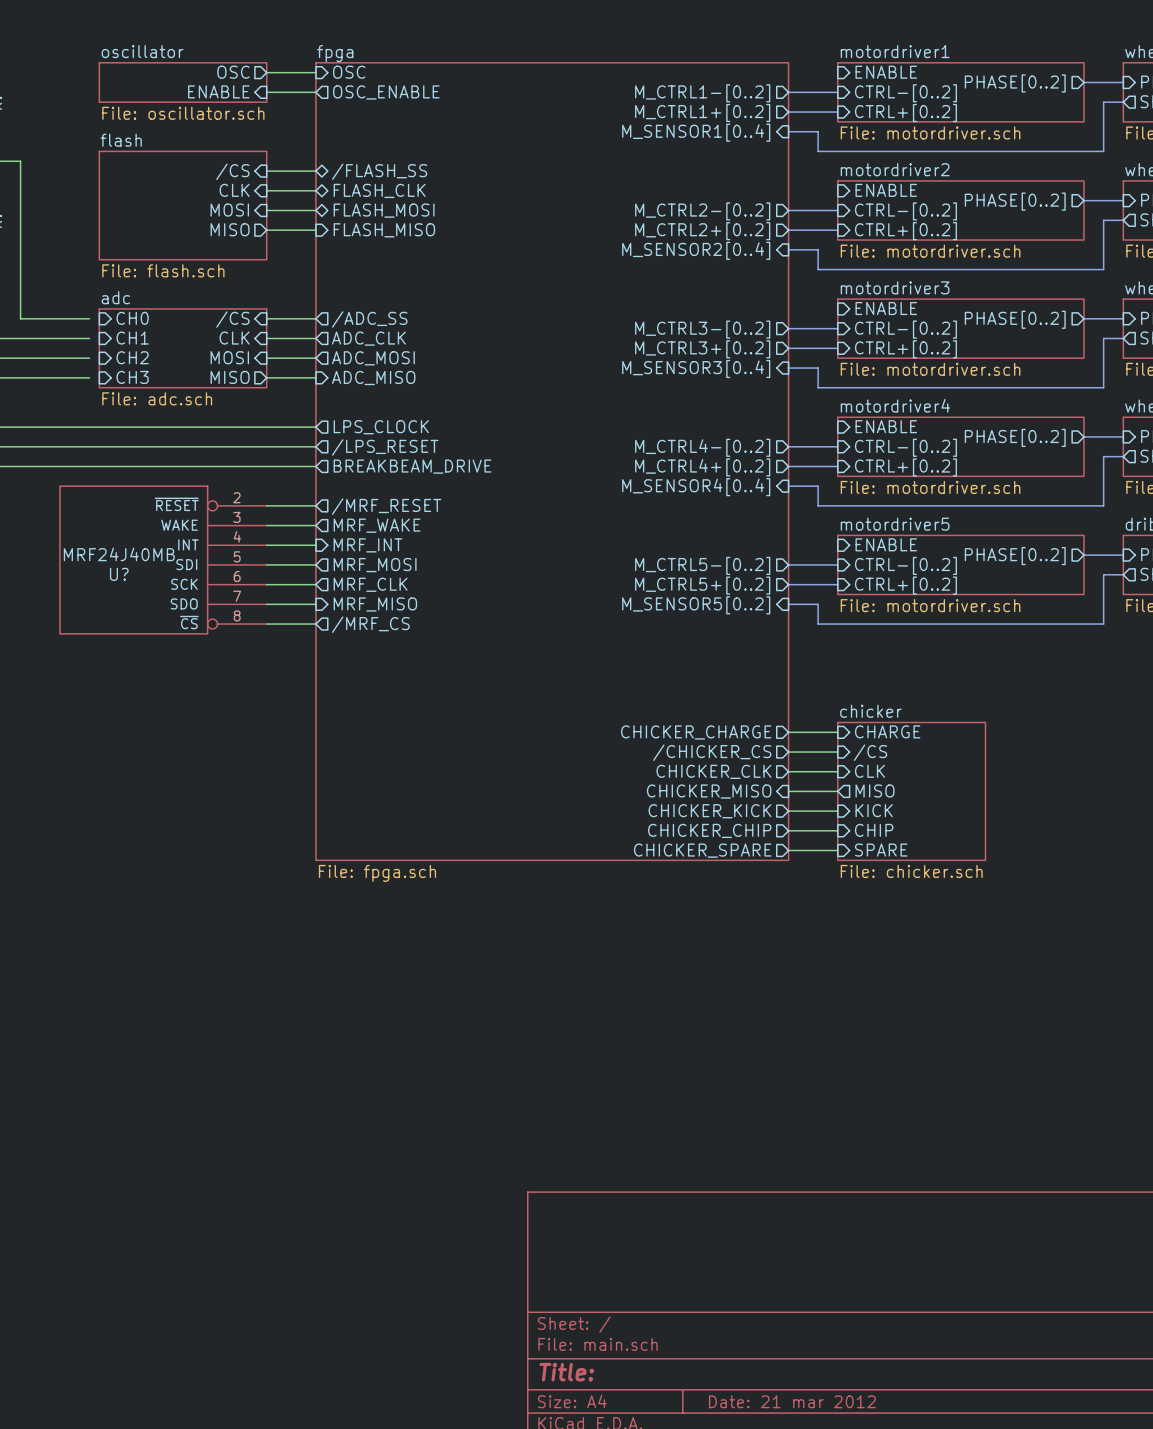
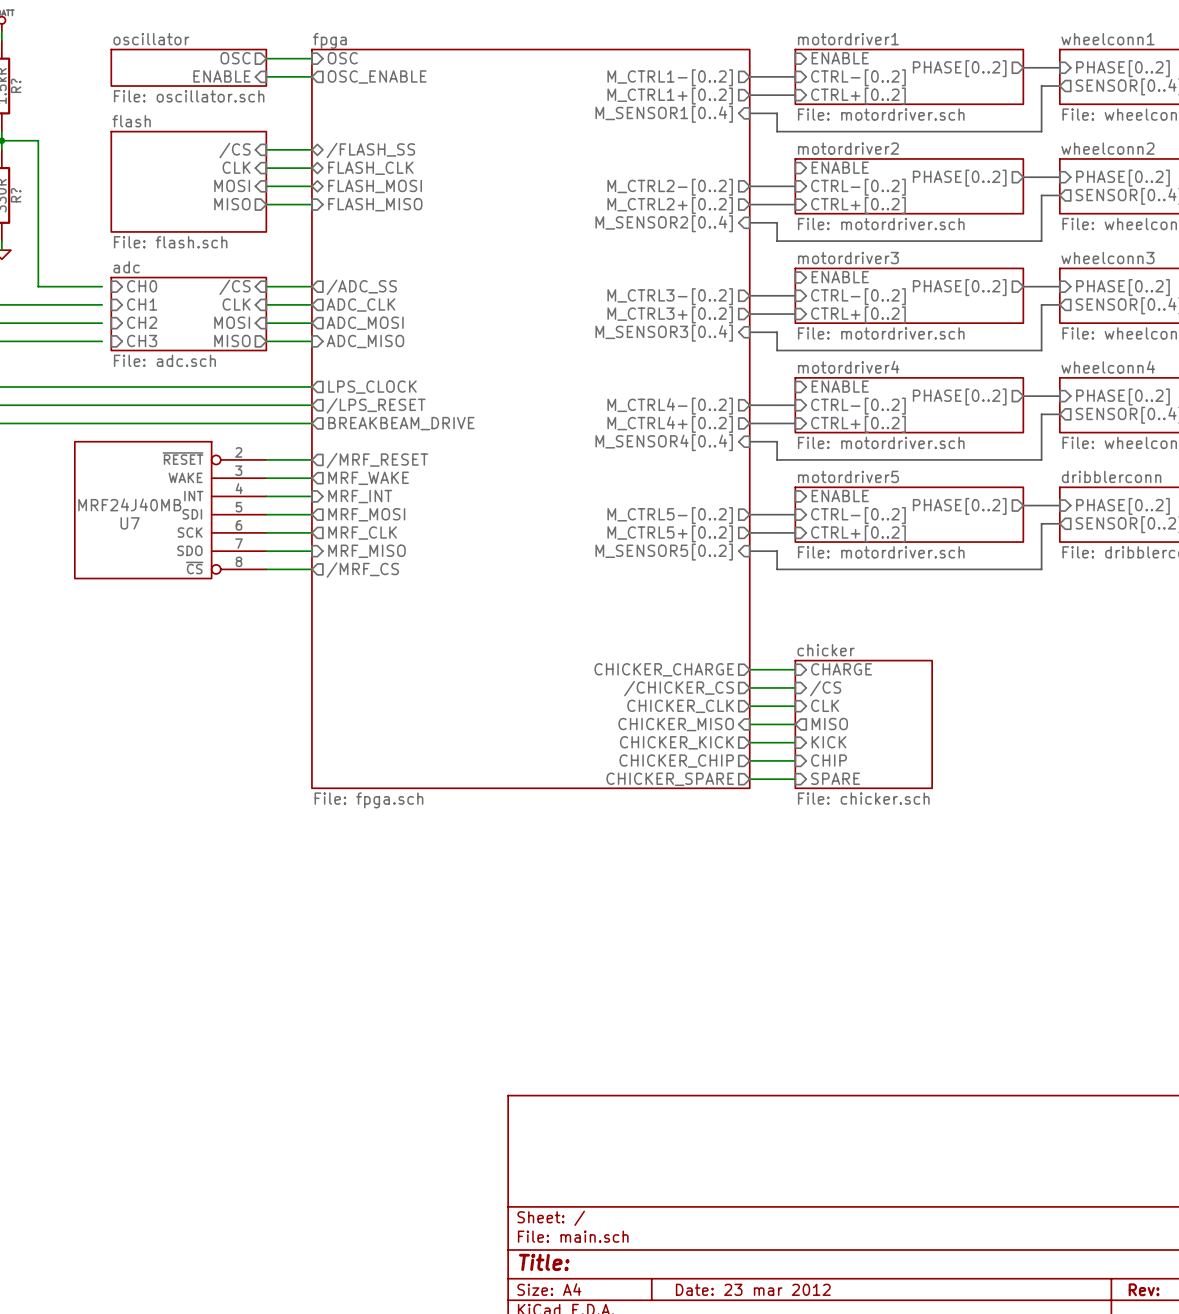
U? name: U? (119, 574) -> U7 (130, 523)
title block: Date: 21 mar 2012 (792, 1401) -> Date: 23 mar 2012 (753, 1289)

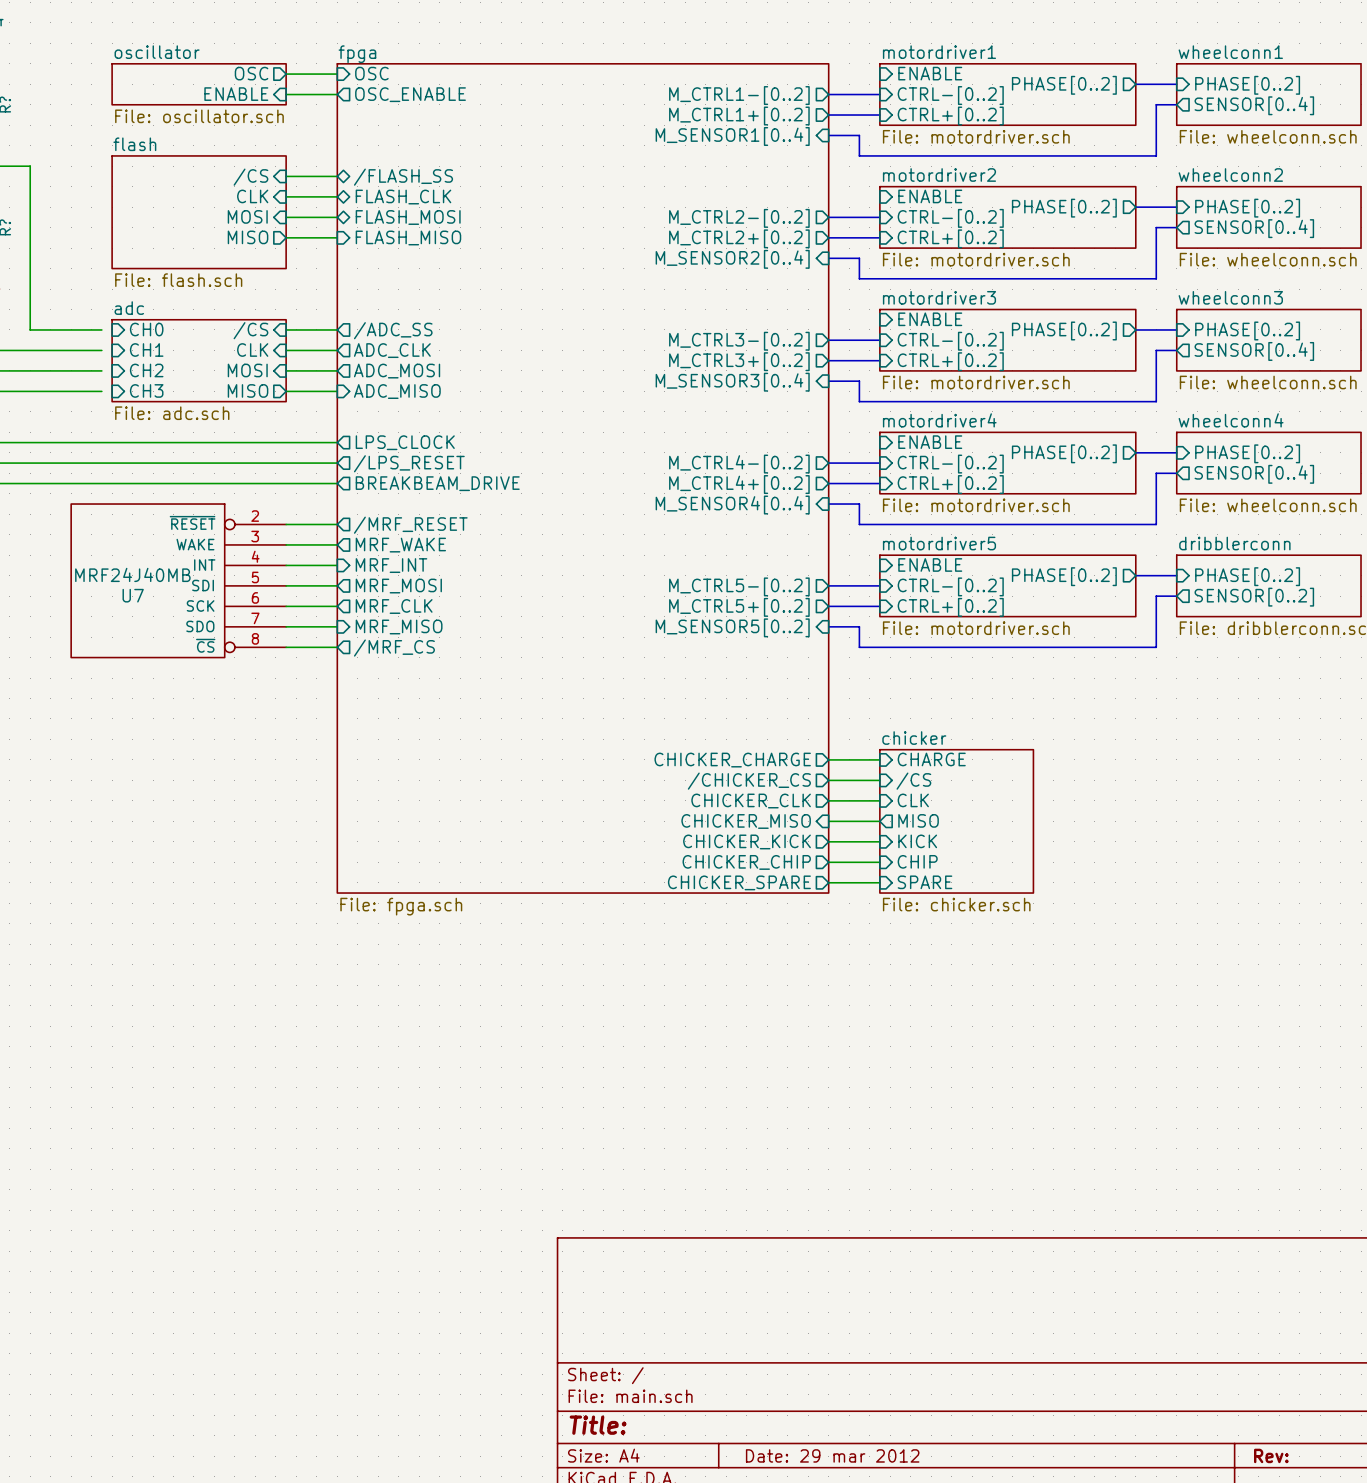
title block: Date: 23 mar 2012 (753, 1289) -> Date: 29 mar 2012 (832, 1455)

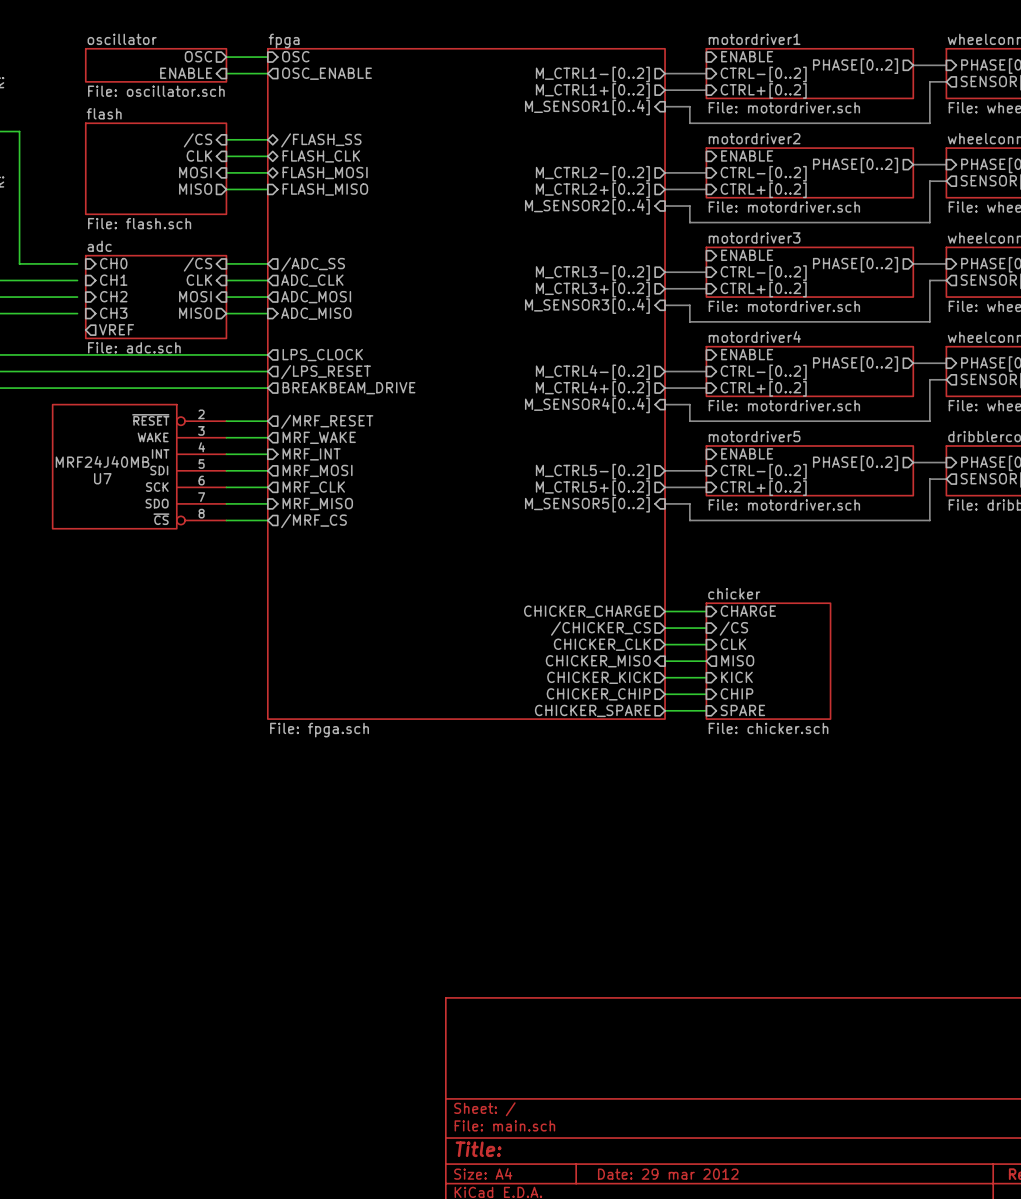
sheet adc: File: adc.sch (199, 360) -> none
sheet adc: none -> File: adc.sch (156, 297)
sheet pin: none -> VREF (116, 329)

